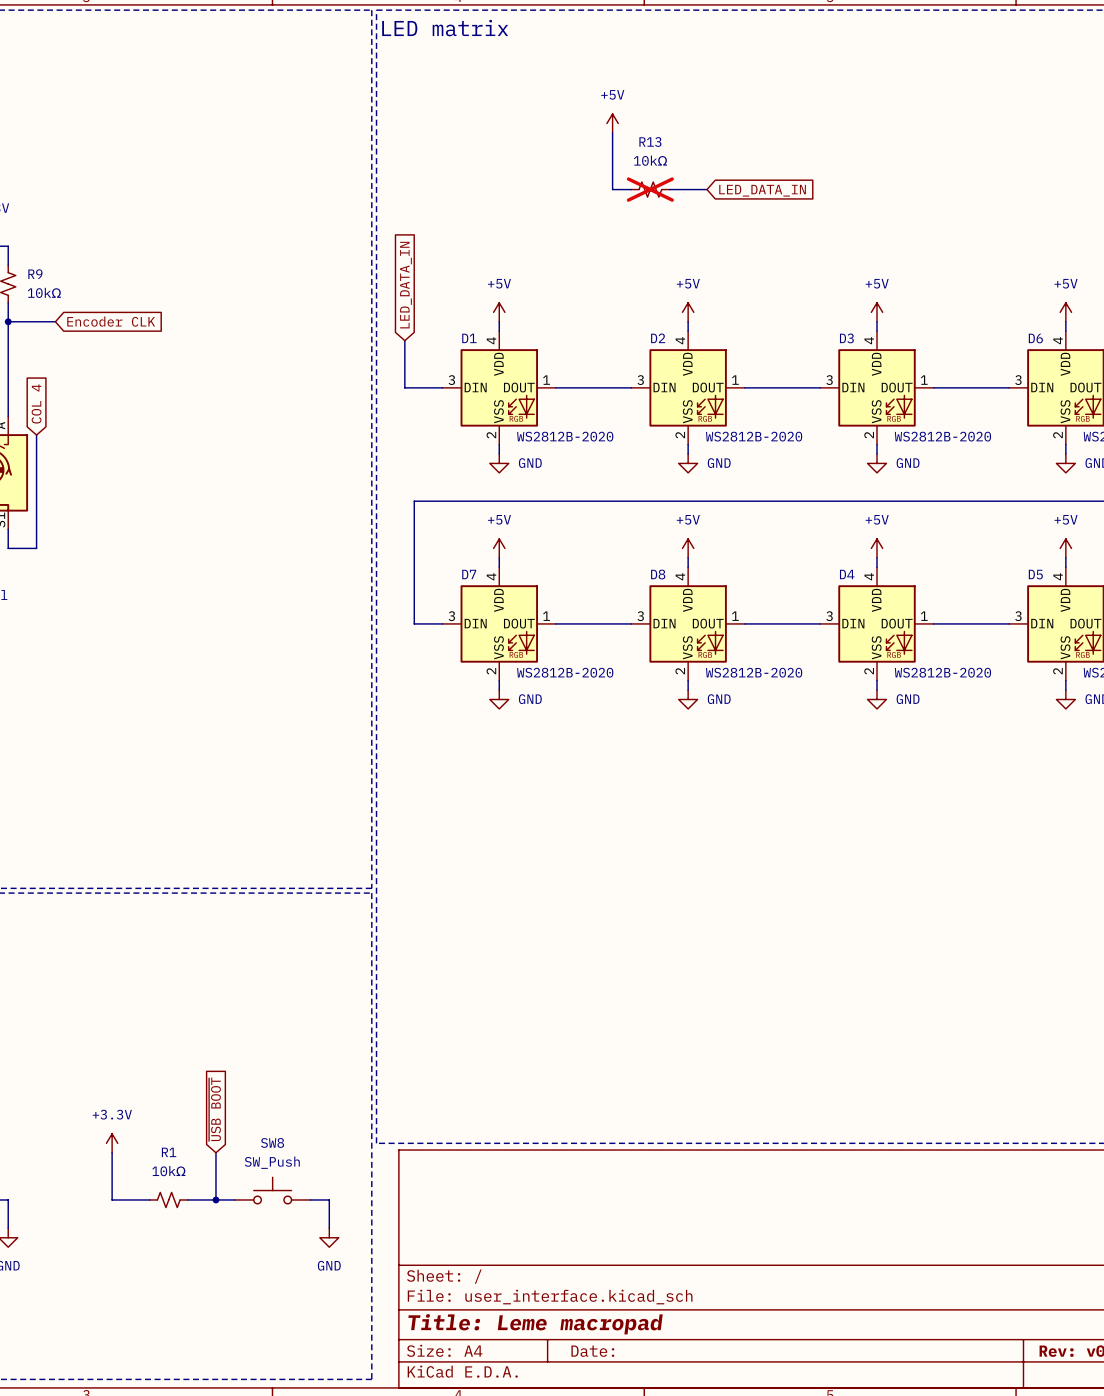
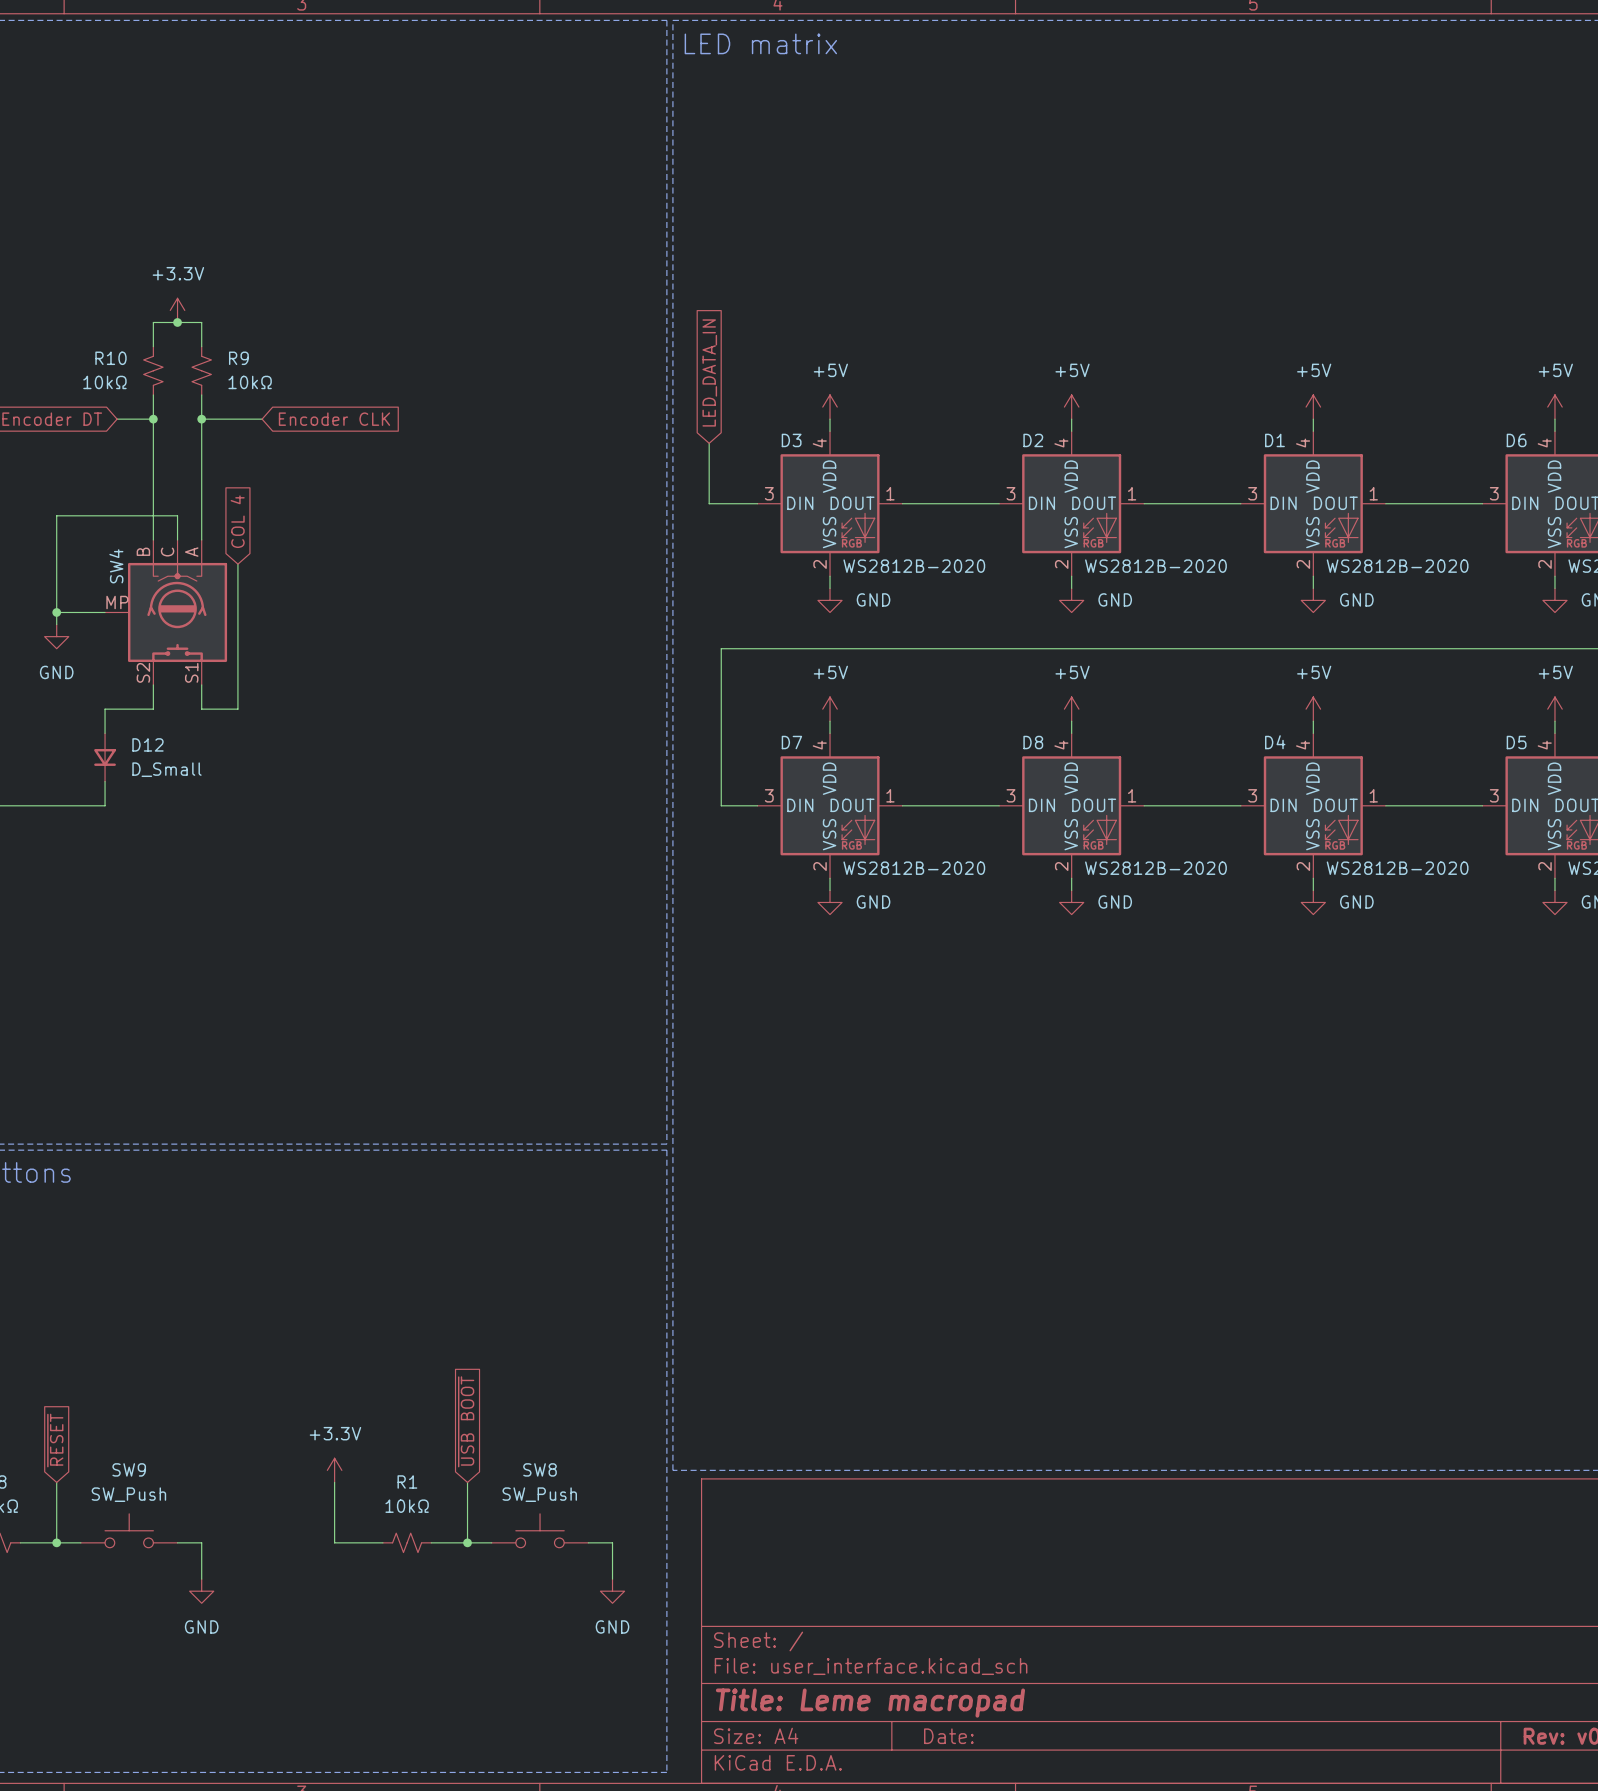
power symbol: +5V (612, 123) -> none
wire: (612, 132) (612, 189) (631, 189) -> none
R13: 10kΩ (650, 189) -> none
wire: (669, 189) (707, 189) -> none
global label: LED_DATA_IN (762, 190) -> none
D1 name: D1 (469, 338) -> D3 (791, 440)
D3 name: D3 (846, 338) -> D1 (1274, 440)

